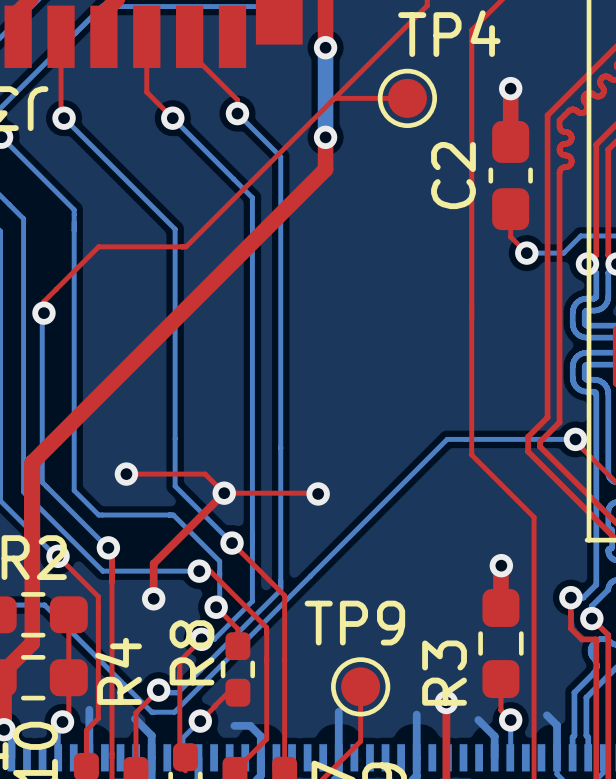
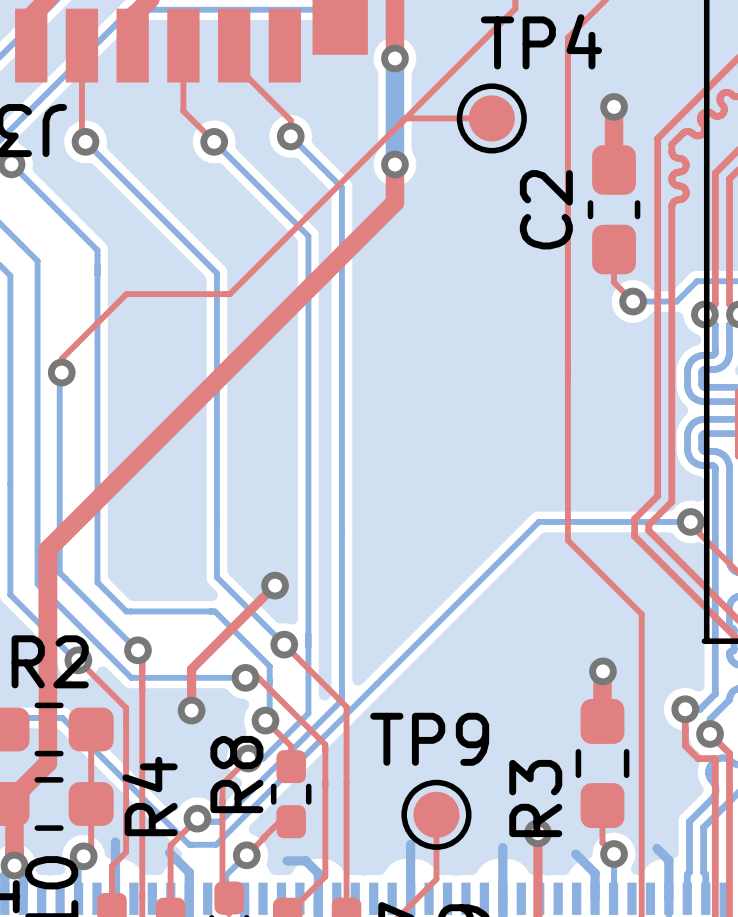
top track: (126, 474) (205, 474) (224, 493) (318, 493) -> none
via: (126, 474) -> none
via: (318, 493) -> none

